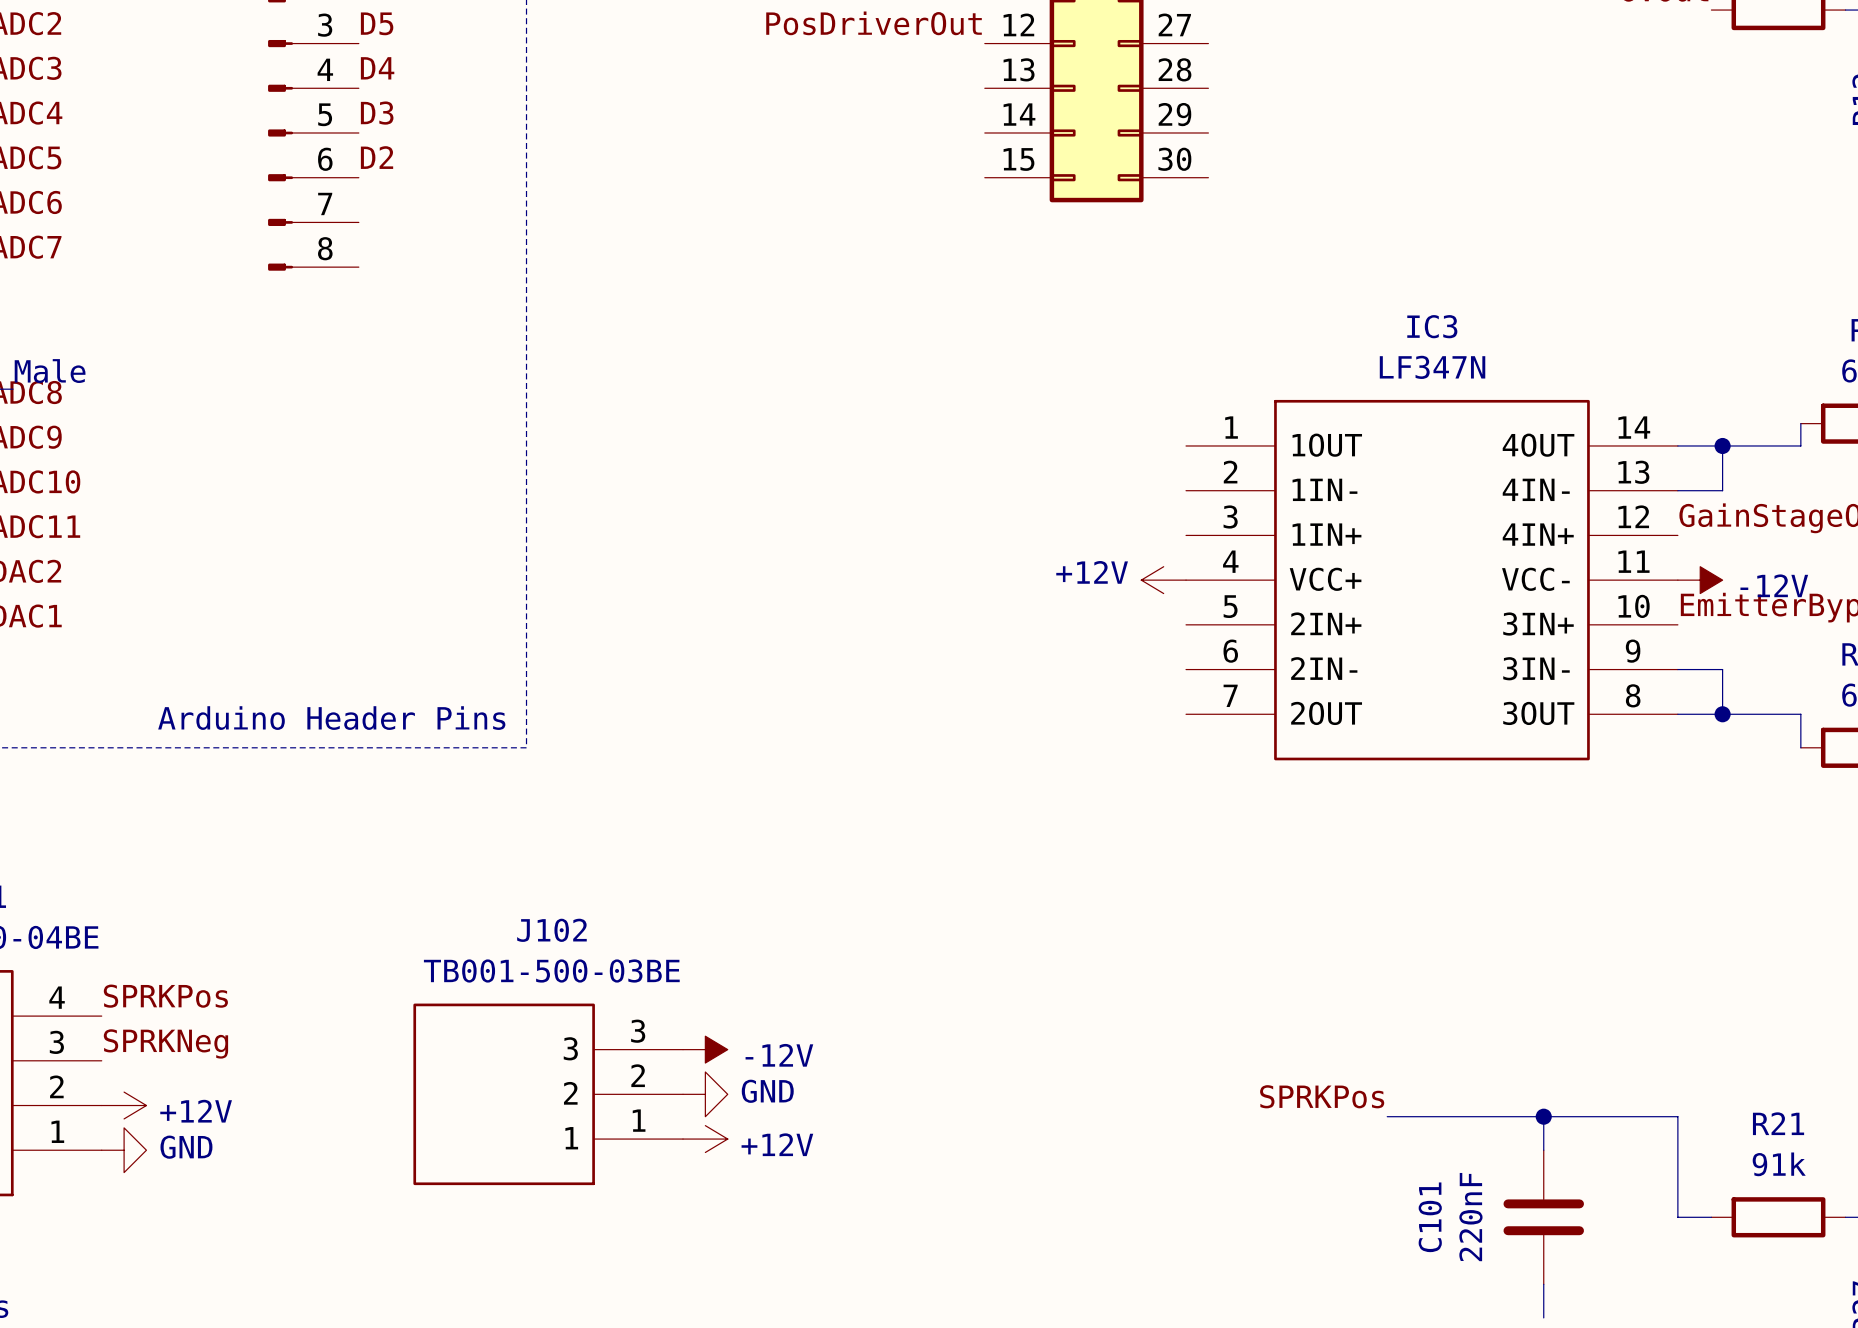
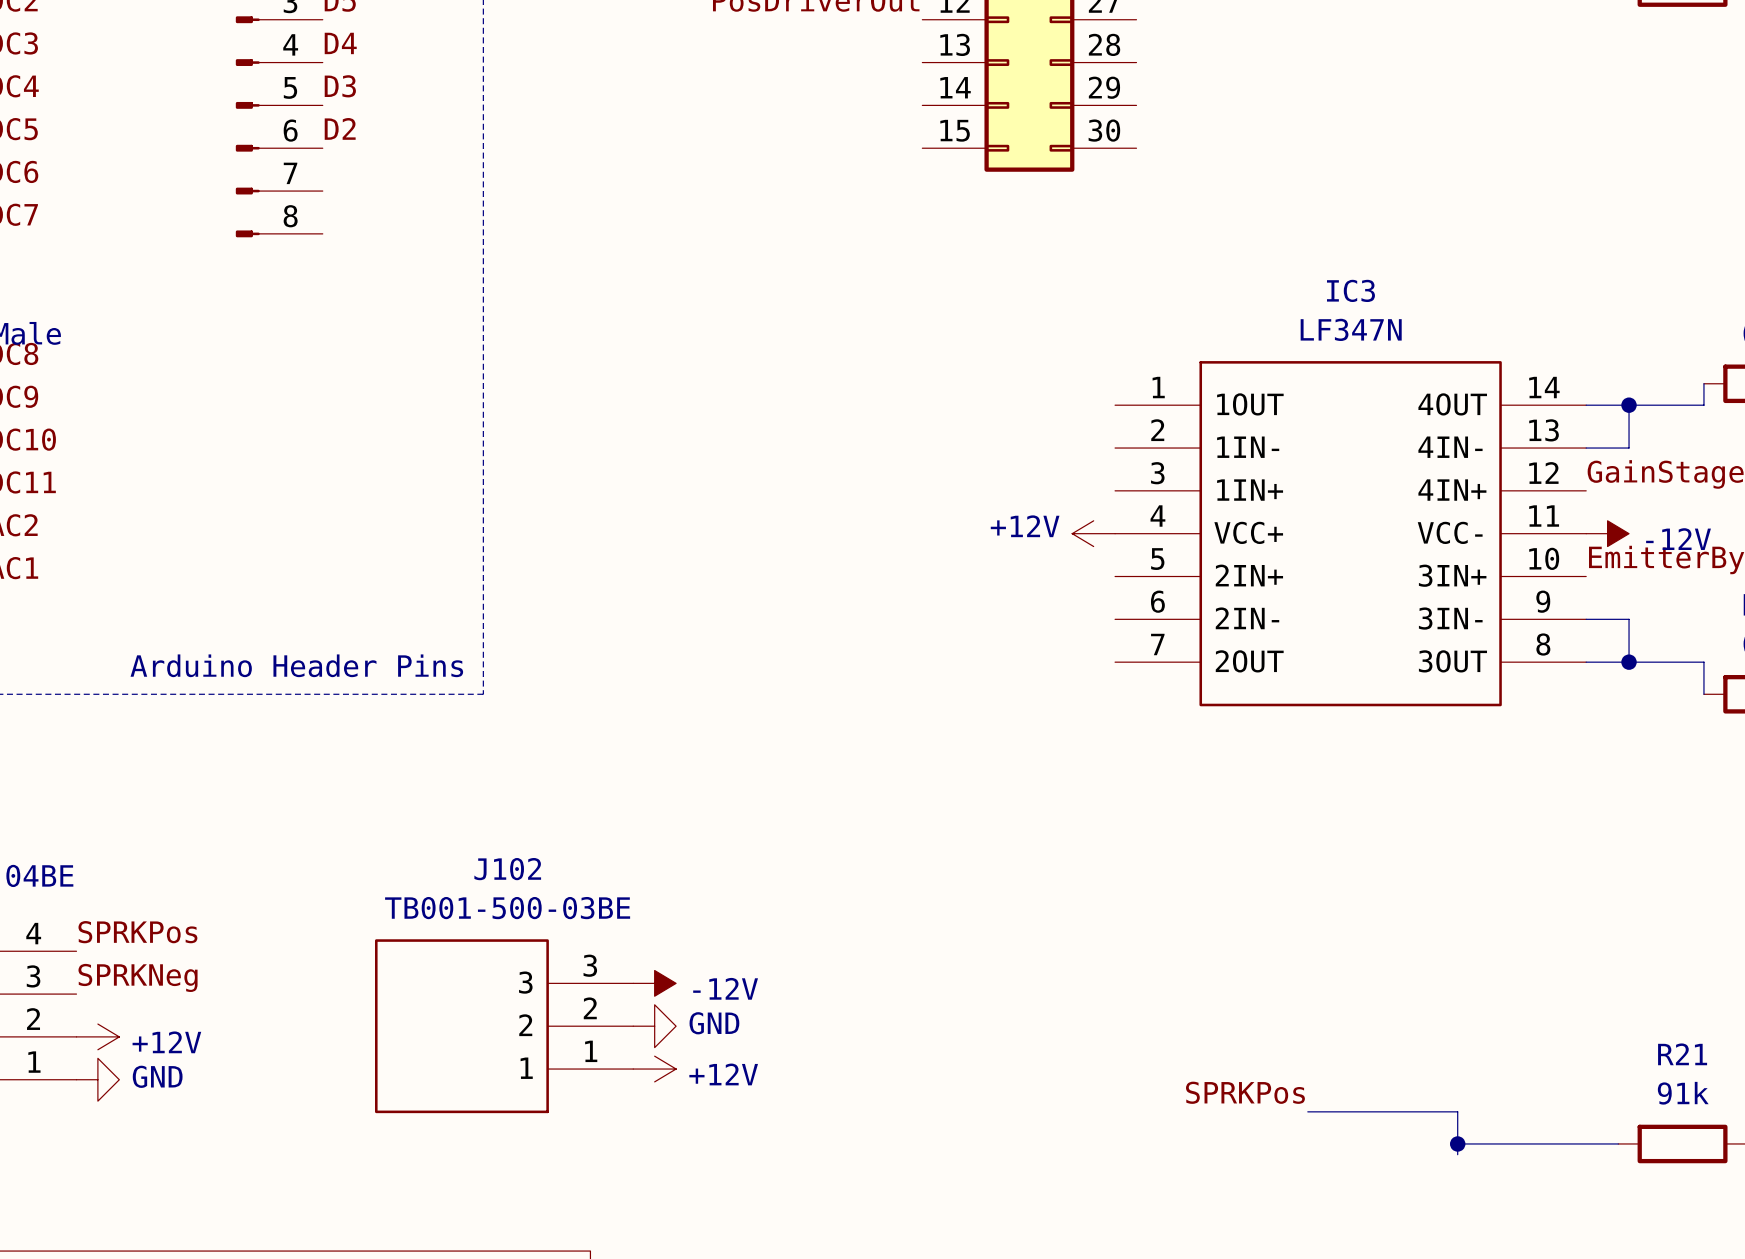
label position: SPRKPos (1322, 1096) -> SPRKPos (1245, 1092)
wire: (1387, 1116) (1677, 1116) (1677, 1217) -> (1457, 1143) (1586, 1143)
wire: (1543, 1116) (1543, 1150) -> none
junction position: (1543, 1116) -> (1457, 1143)
wire: none -> (1307, 1111) (1457, 1111) (1457, 1154)
C101: 220nF (1543, 1217) -> none
wire: (1543, 1284) (1543, 1317) -> none

